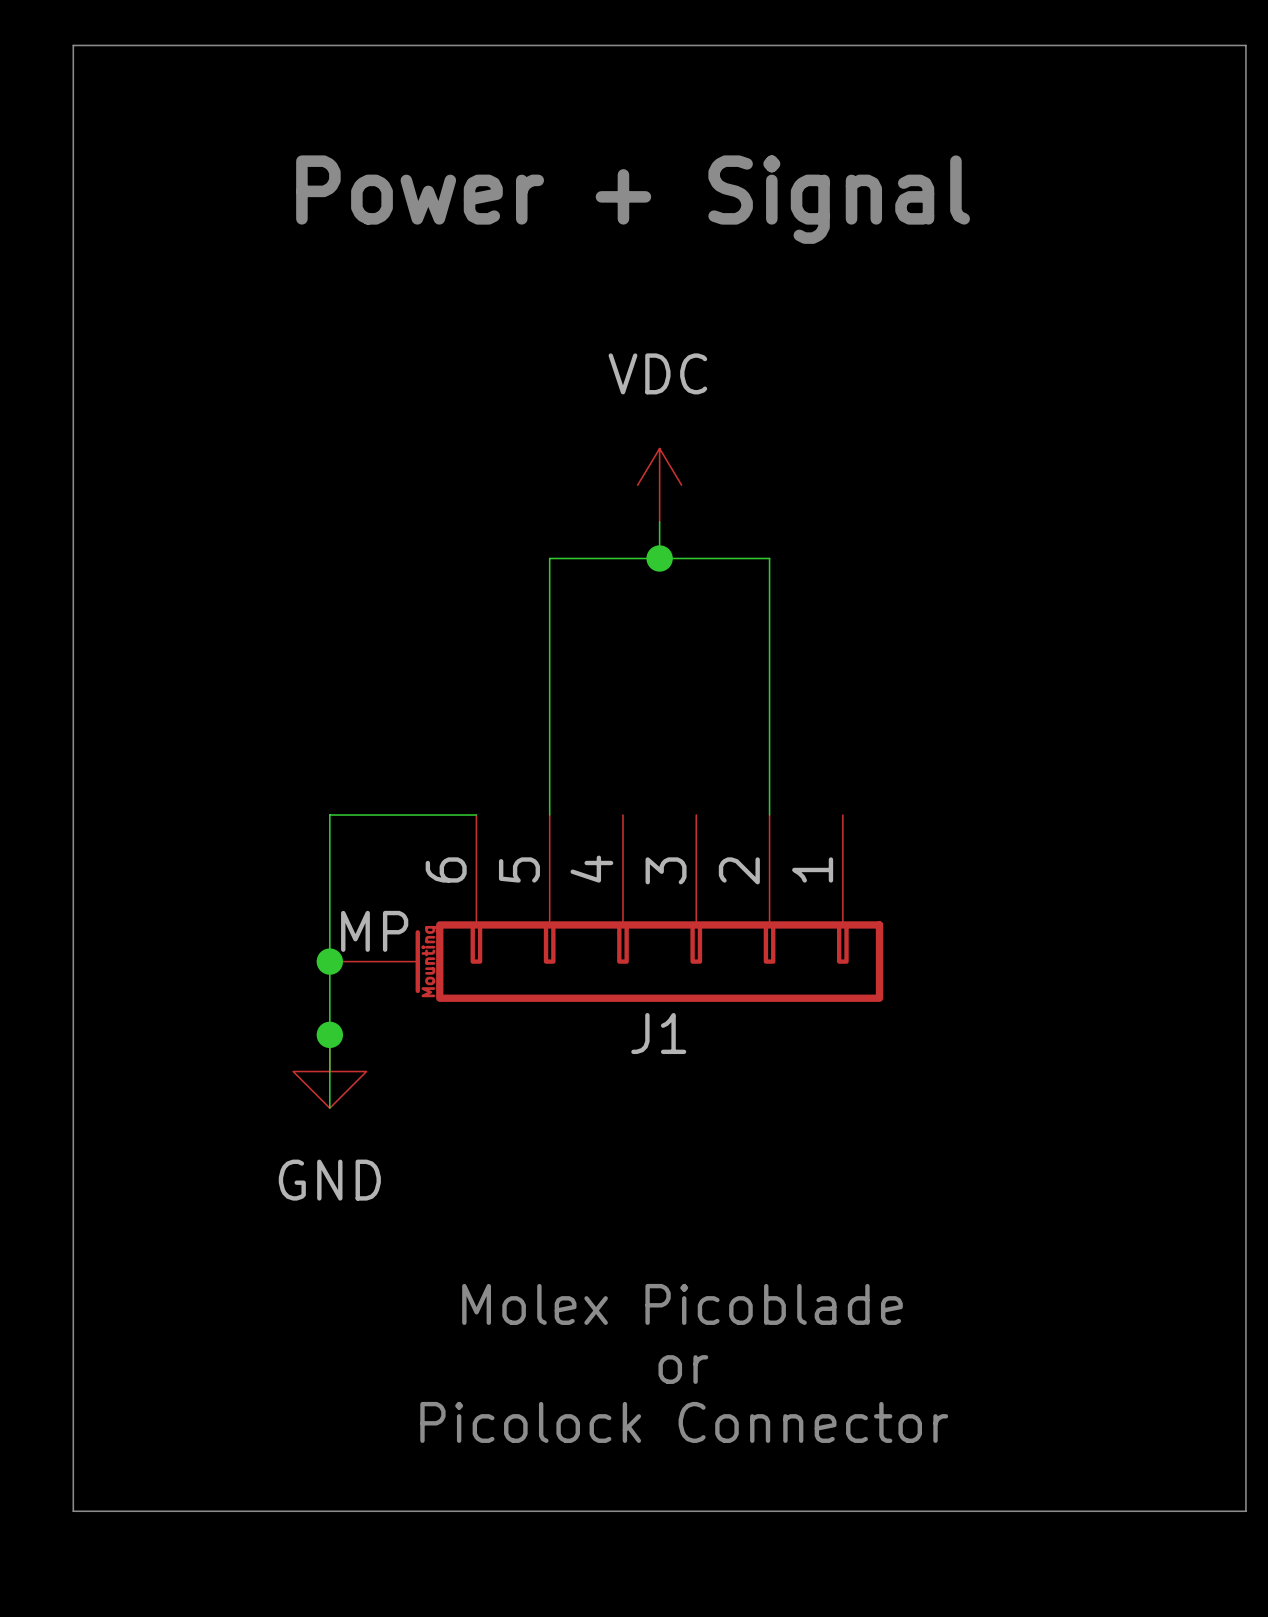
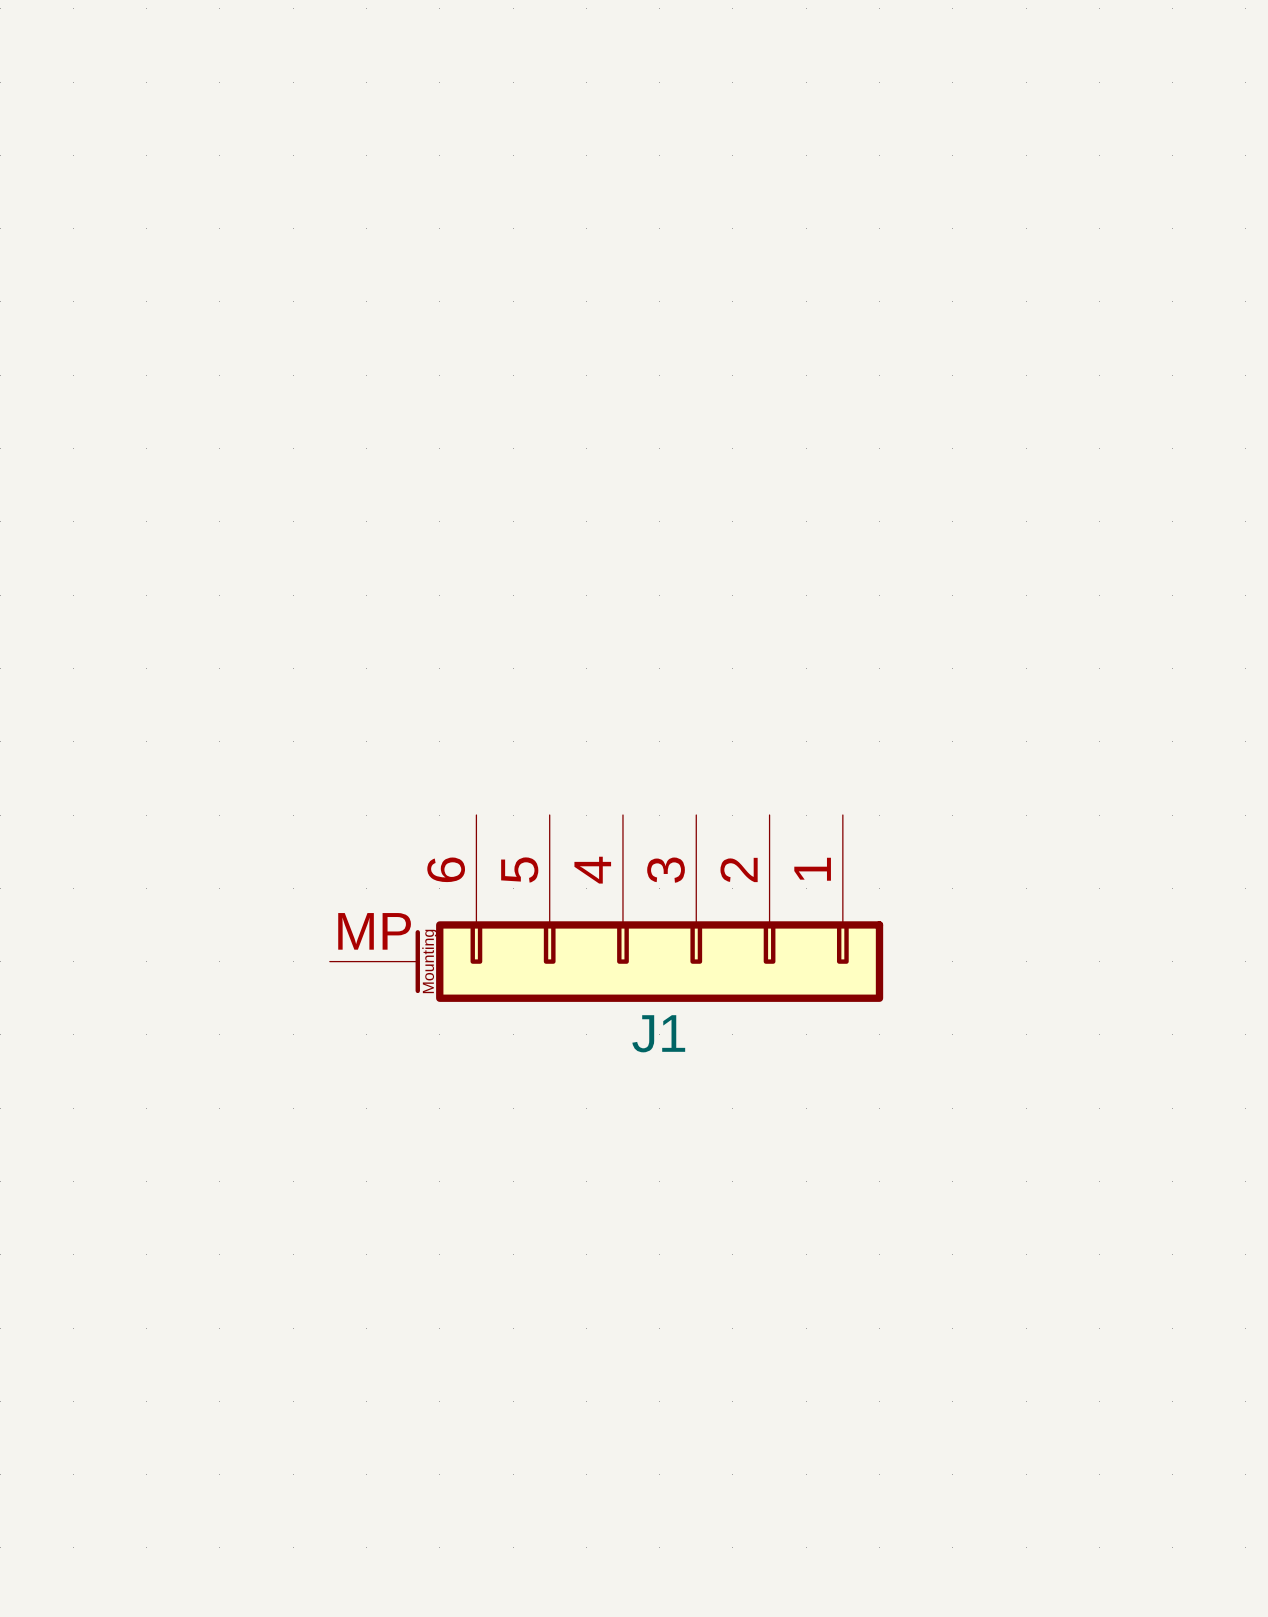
line: (73, 45) (1245, 45) (1245, 1511) (73, 1511) (73, 45) -> none
text: Power + Signal (633, 199) -> none
power symbol: VDC (659, 485) -> none
wire: (659, 521) (659, 558) -> none
junction: (659, 558) -> none
wire: (476, 815) (329, 815) (329, 1108) -> none
wire: (549, 815) (549, 558) (769, 558) (769, 815) -> none
junction: (329, 961) -> none
junction: (329, 1034) -> none
power symbol: GND (329, 1071) -> none
text: Molex Picoblade (682, 1304) -> none
text: or (683, 1369) -> none
text: Picolock Connector (684, 1422) -> none

